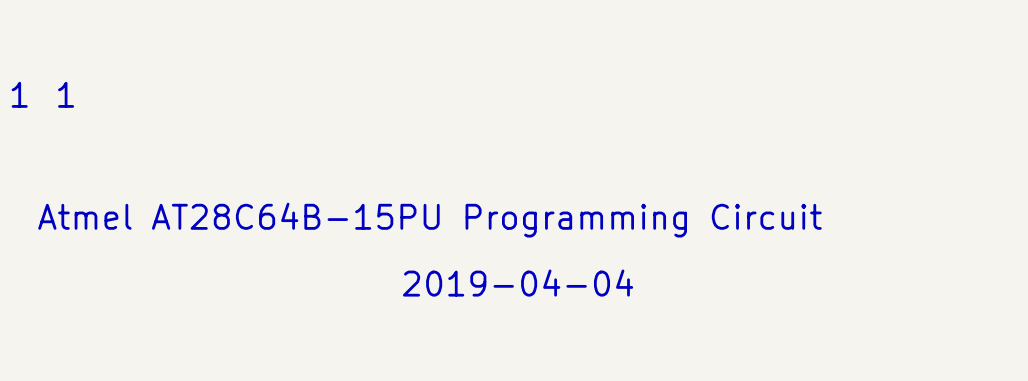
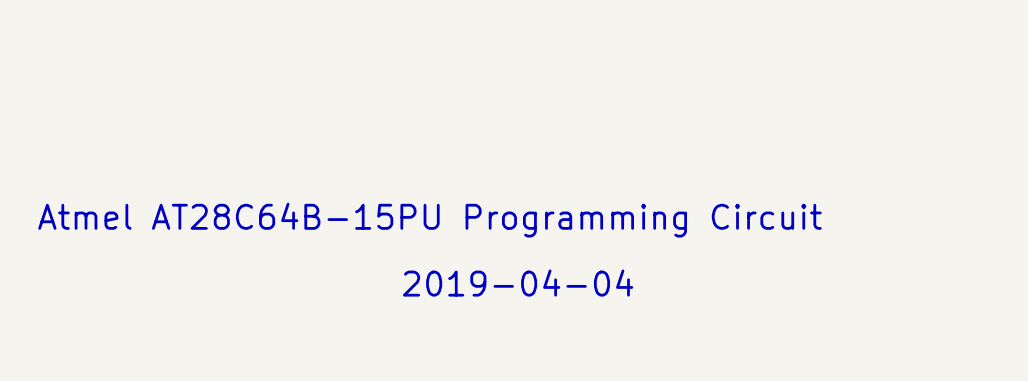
text: 1 (19, 94) -> none
text: 1 (66, 94) -> none

